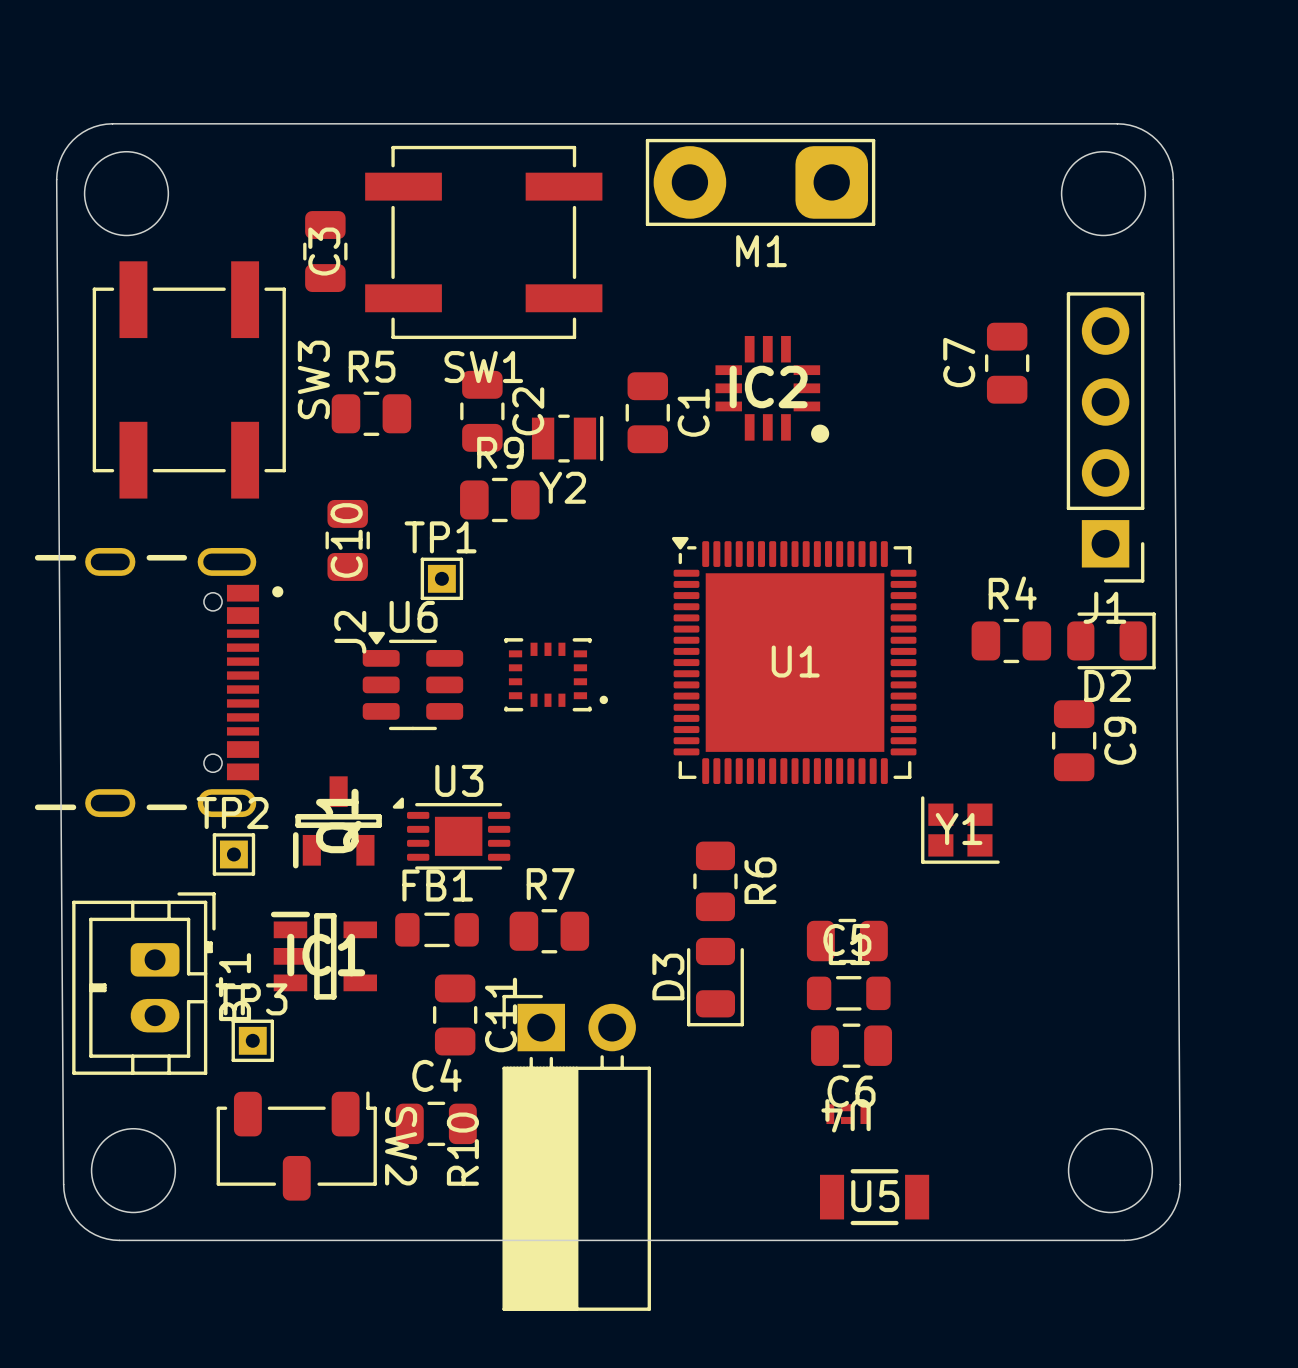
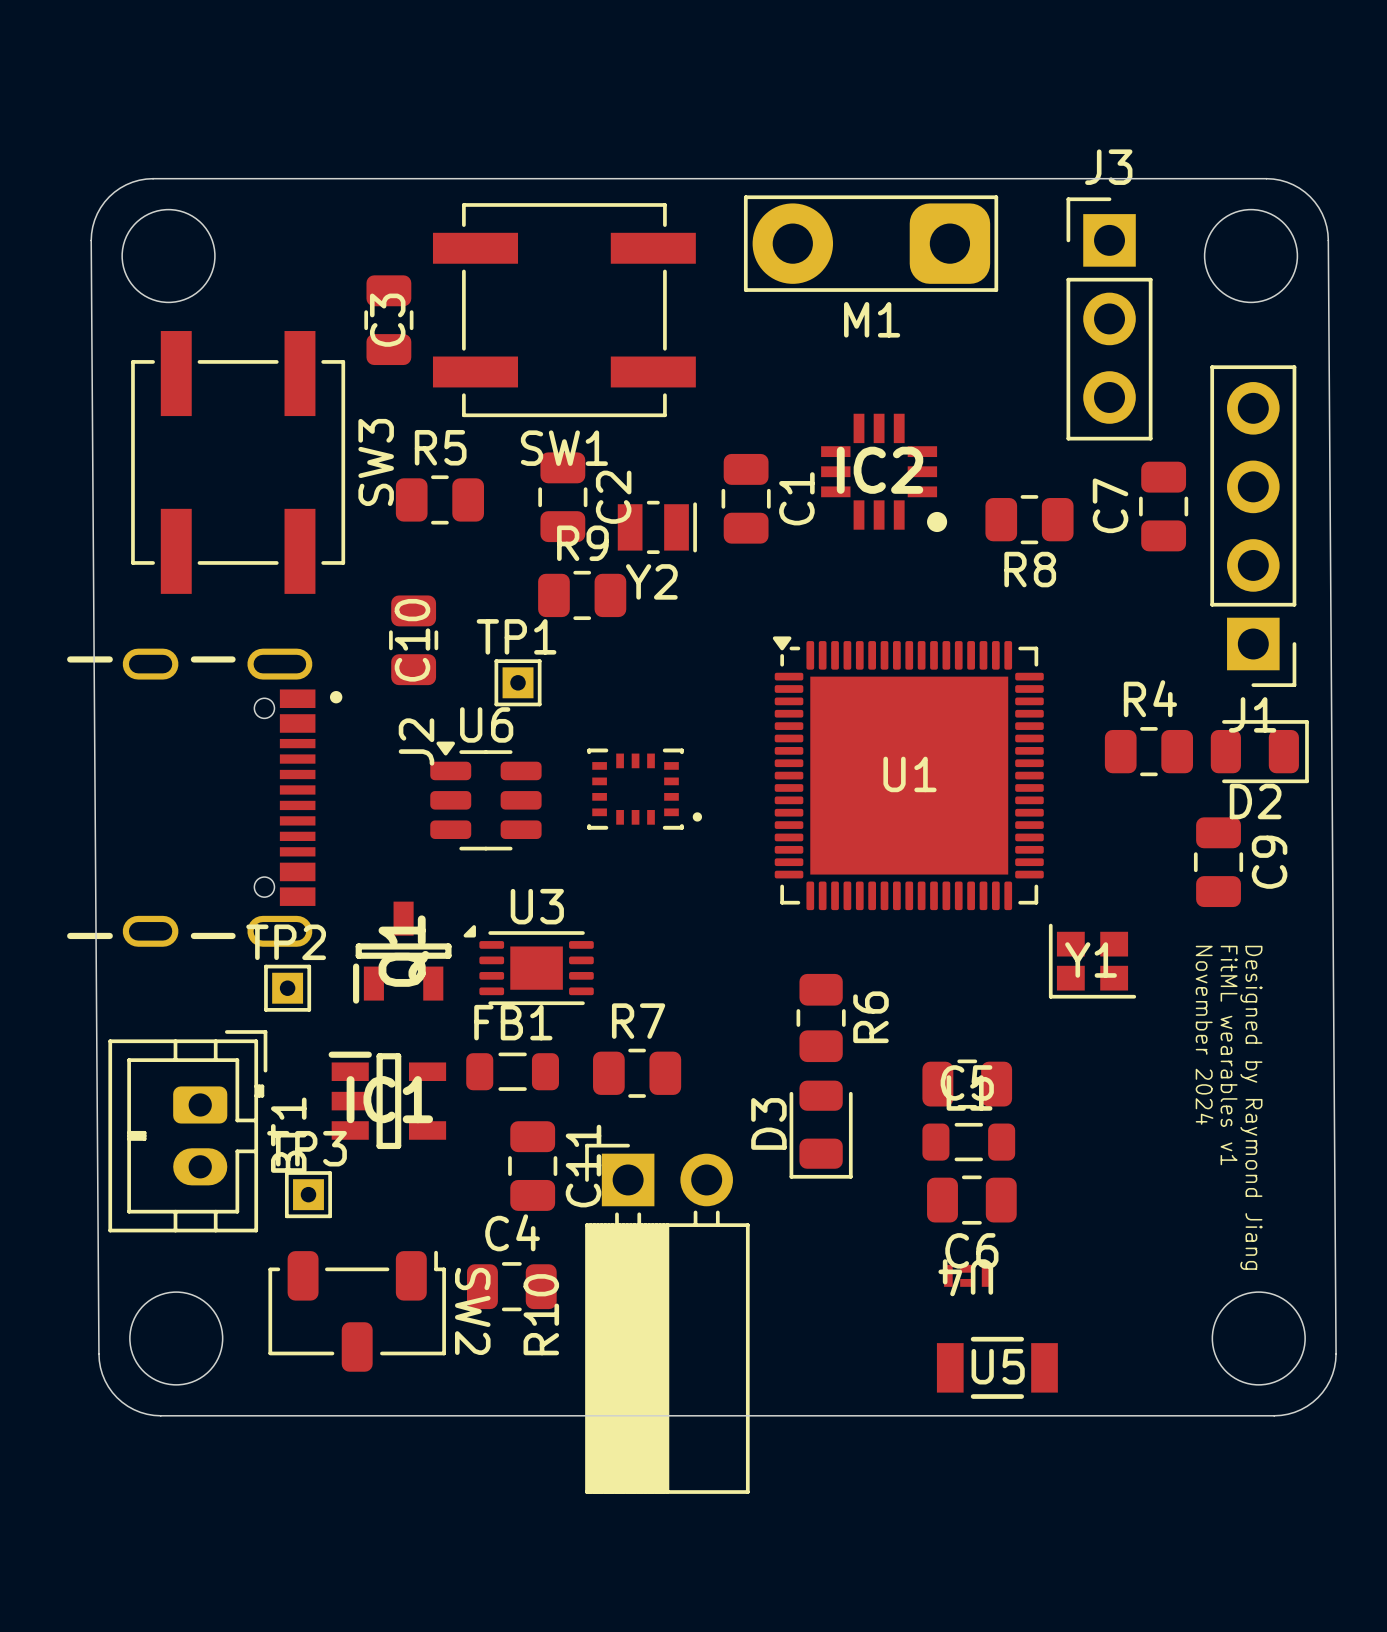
J3: none -> (1109, 318)
C7 position: (1007, 363) -> (1163, 506)
R8: none -> (1029, 519)
text: none -> November 2024 (1204, 1035)
text: none -> FitML wearables v1 (1229, 1055)
text: none -> Designed by Raymond Jiang (1251, 1107)

